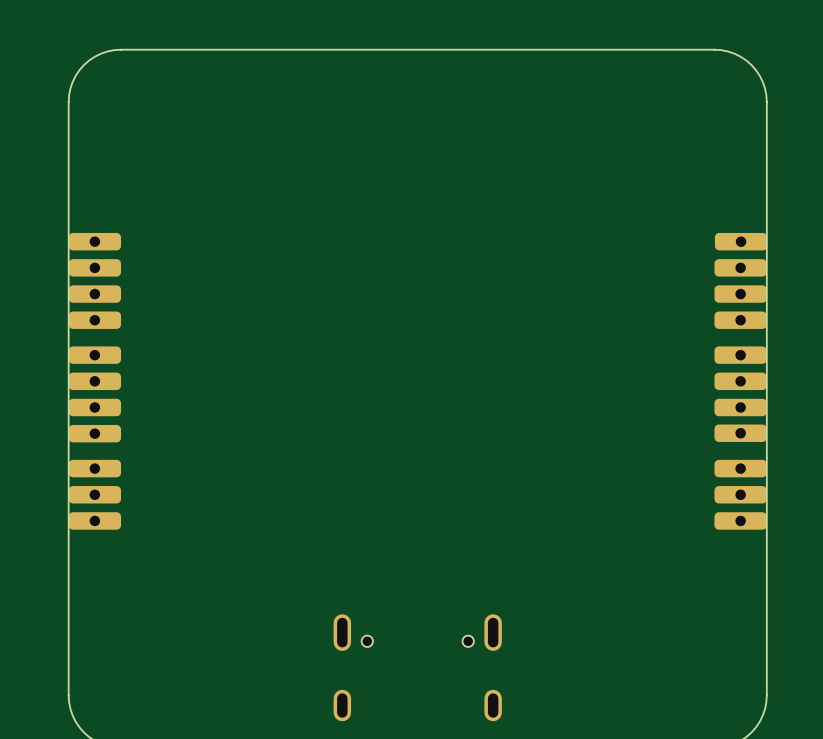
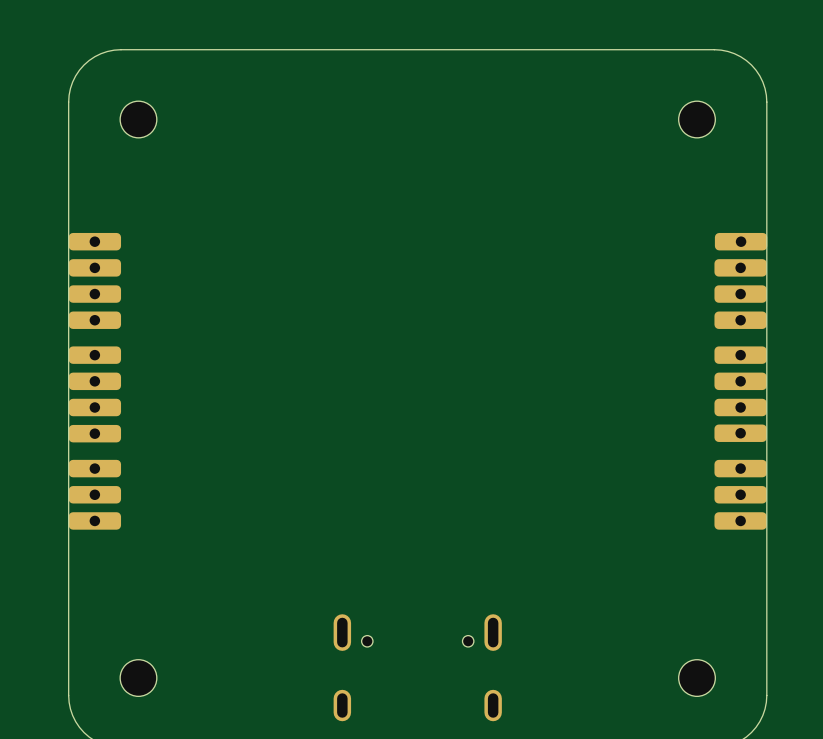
part: none -> (138, 119)
part: none -> (697, 119)
part: none -> (138, 678)
part: none -> (697, 678)

